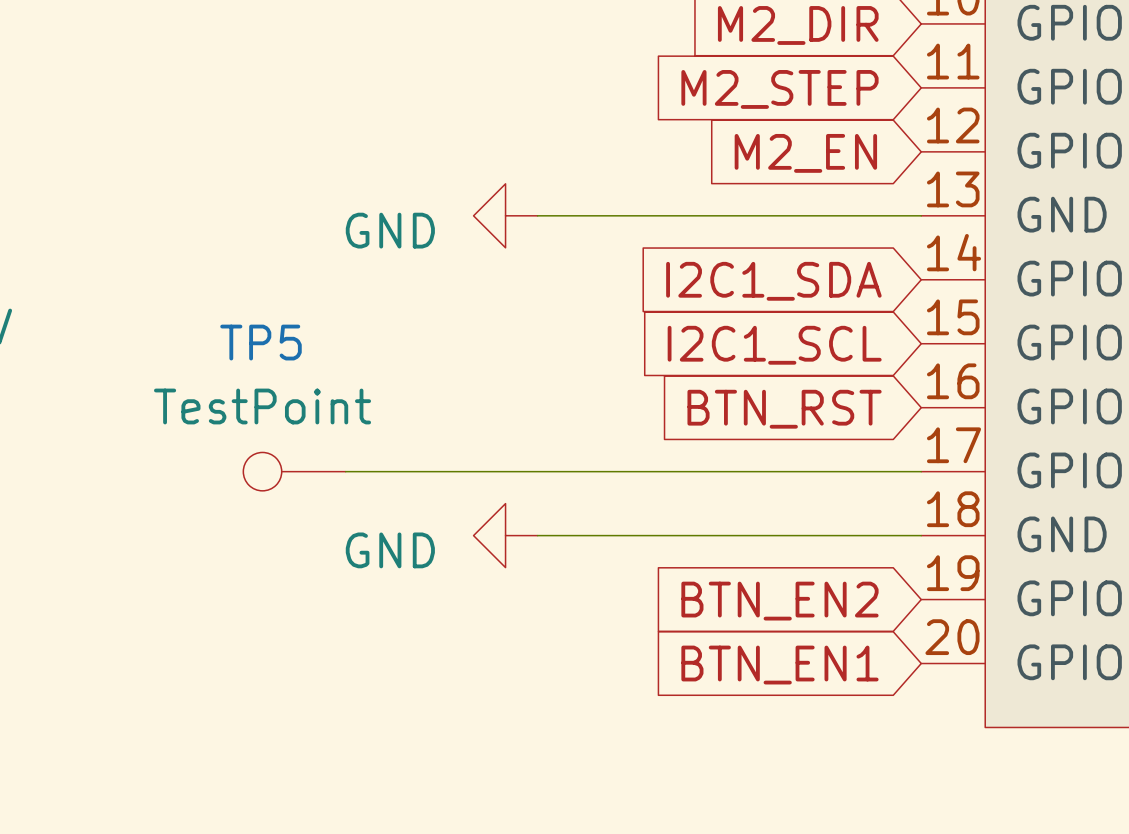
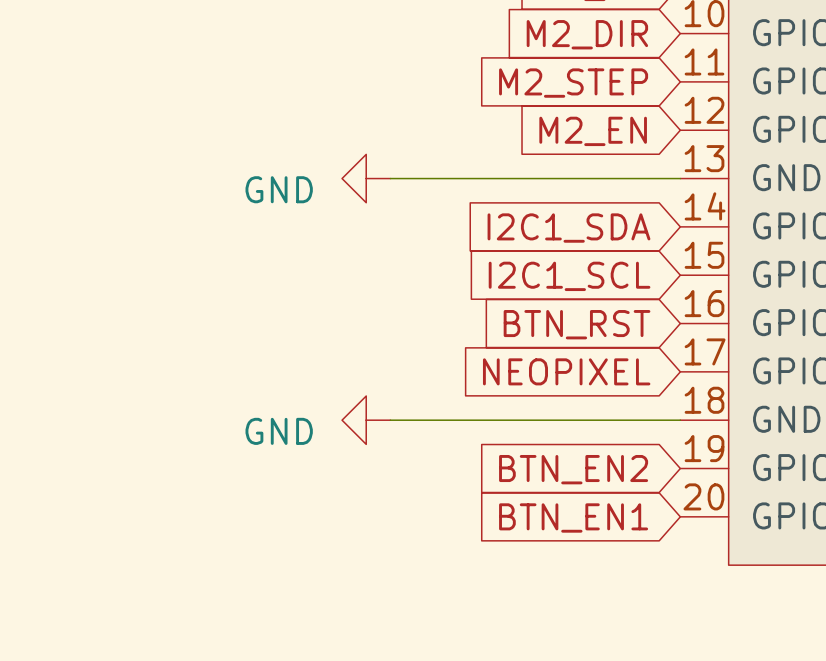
TP5: TestPoint (294, 471) -> none
wire: (345, 471) (921, 471) -> none
global label: none -> NEOPIXEL (566, 371)

